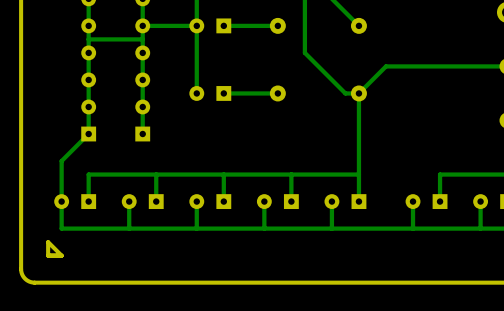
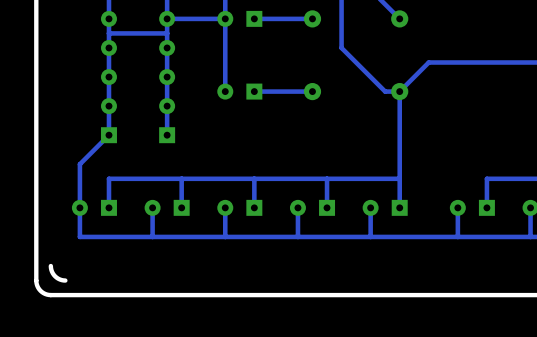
board edge: (48, 242) (61, 255) (48, 255) (48, 242) -> none
board edge: none -> (50, 266) (55, 276) (65, 280)

